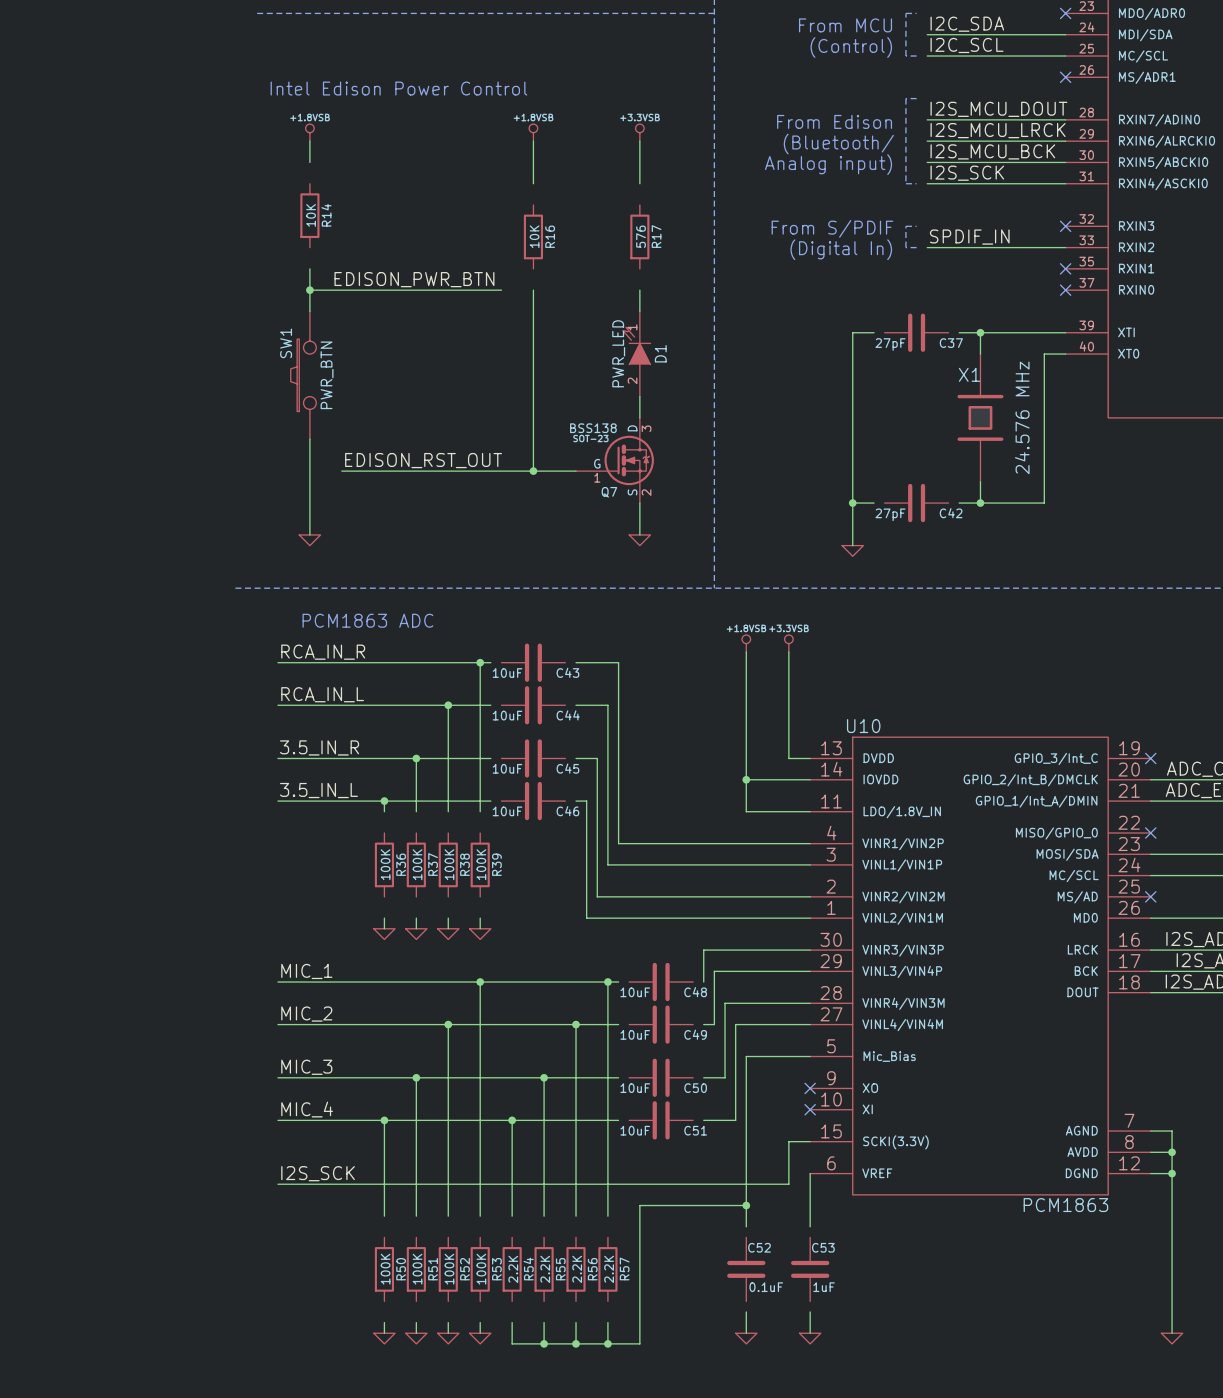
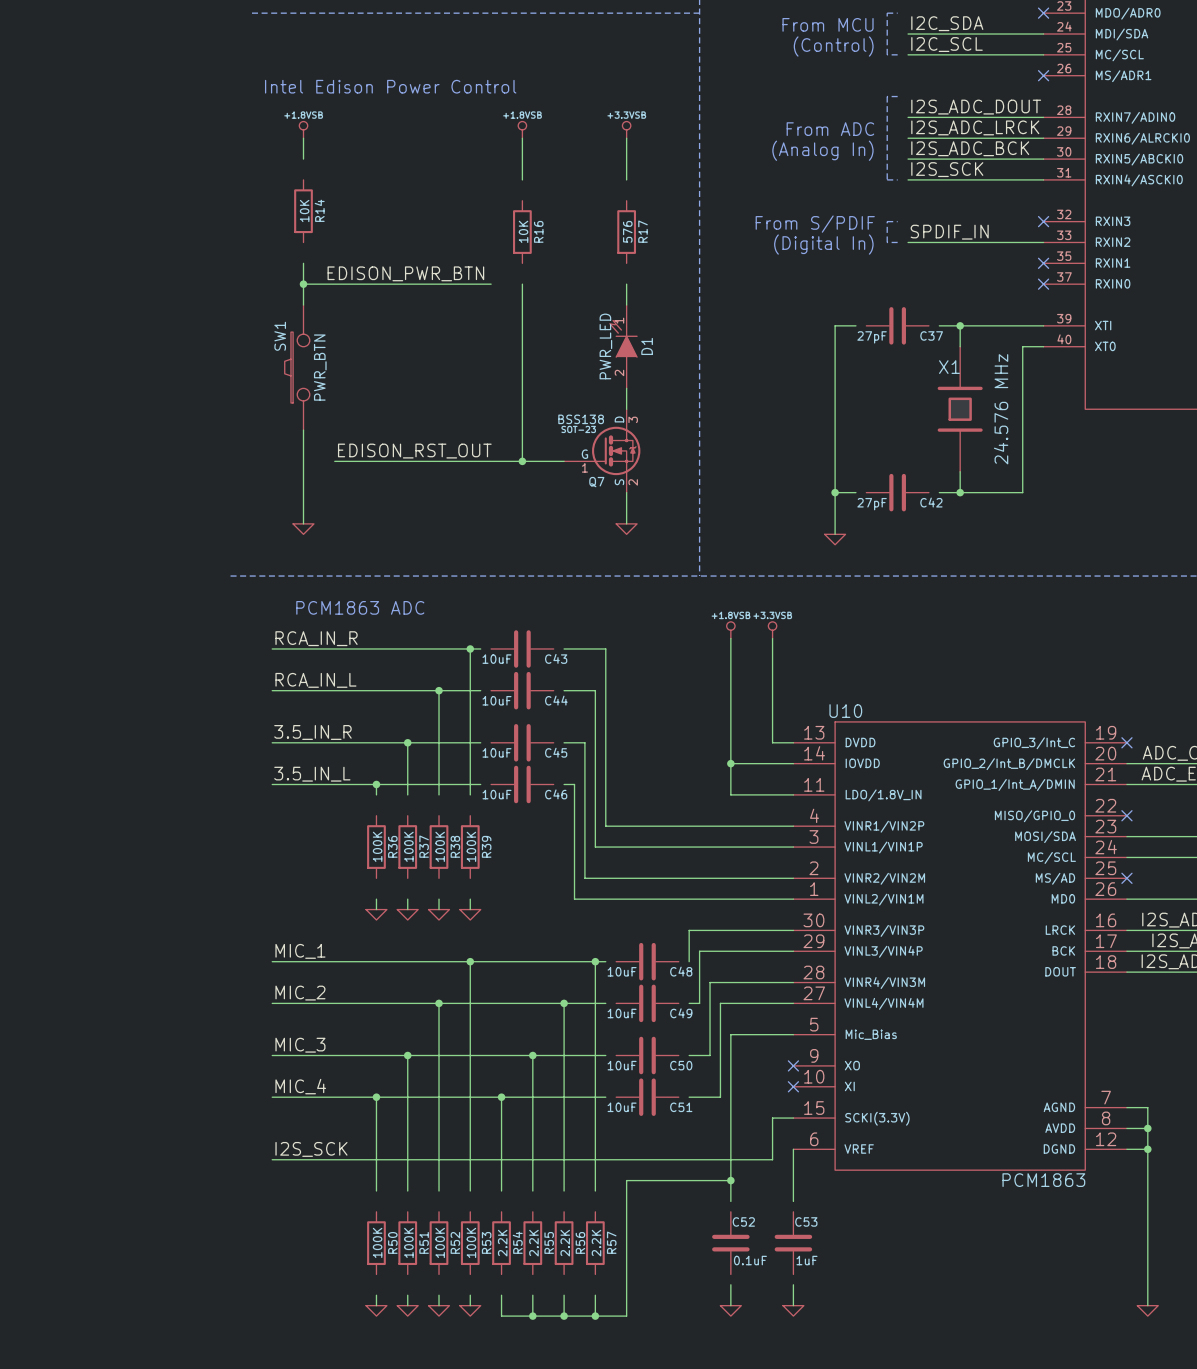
label: I2S_MCU_DOUT (998, 109) -> I2S_ADC_DOUT (976, 107)
text: From Edison (834, 121) -> none
label: I2S_MCU_LRCK (998, 130) -> I2S_ADC_LRCK (975, 127)
text: none -> From ADC (830, 129)
text: (Bluetooth/ (838, 144) -> none
label: I2S_MCU_BCK (992, 151) -> I2S_ADC_BCK (970, 148)
text: Analog input) (828, 164) -> (Analog In) (822, 150)

